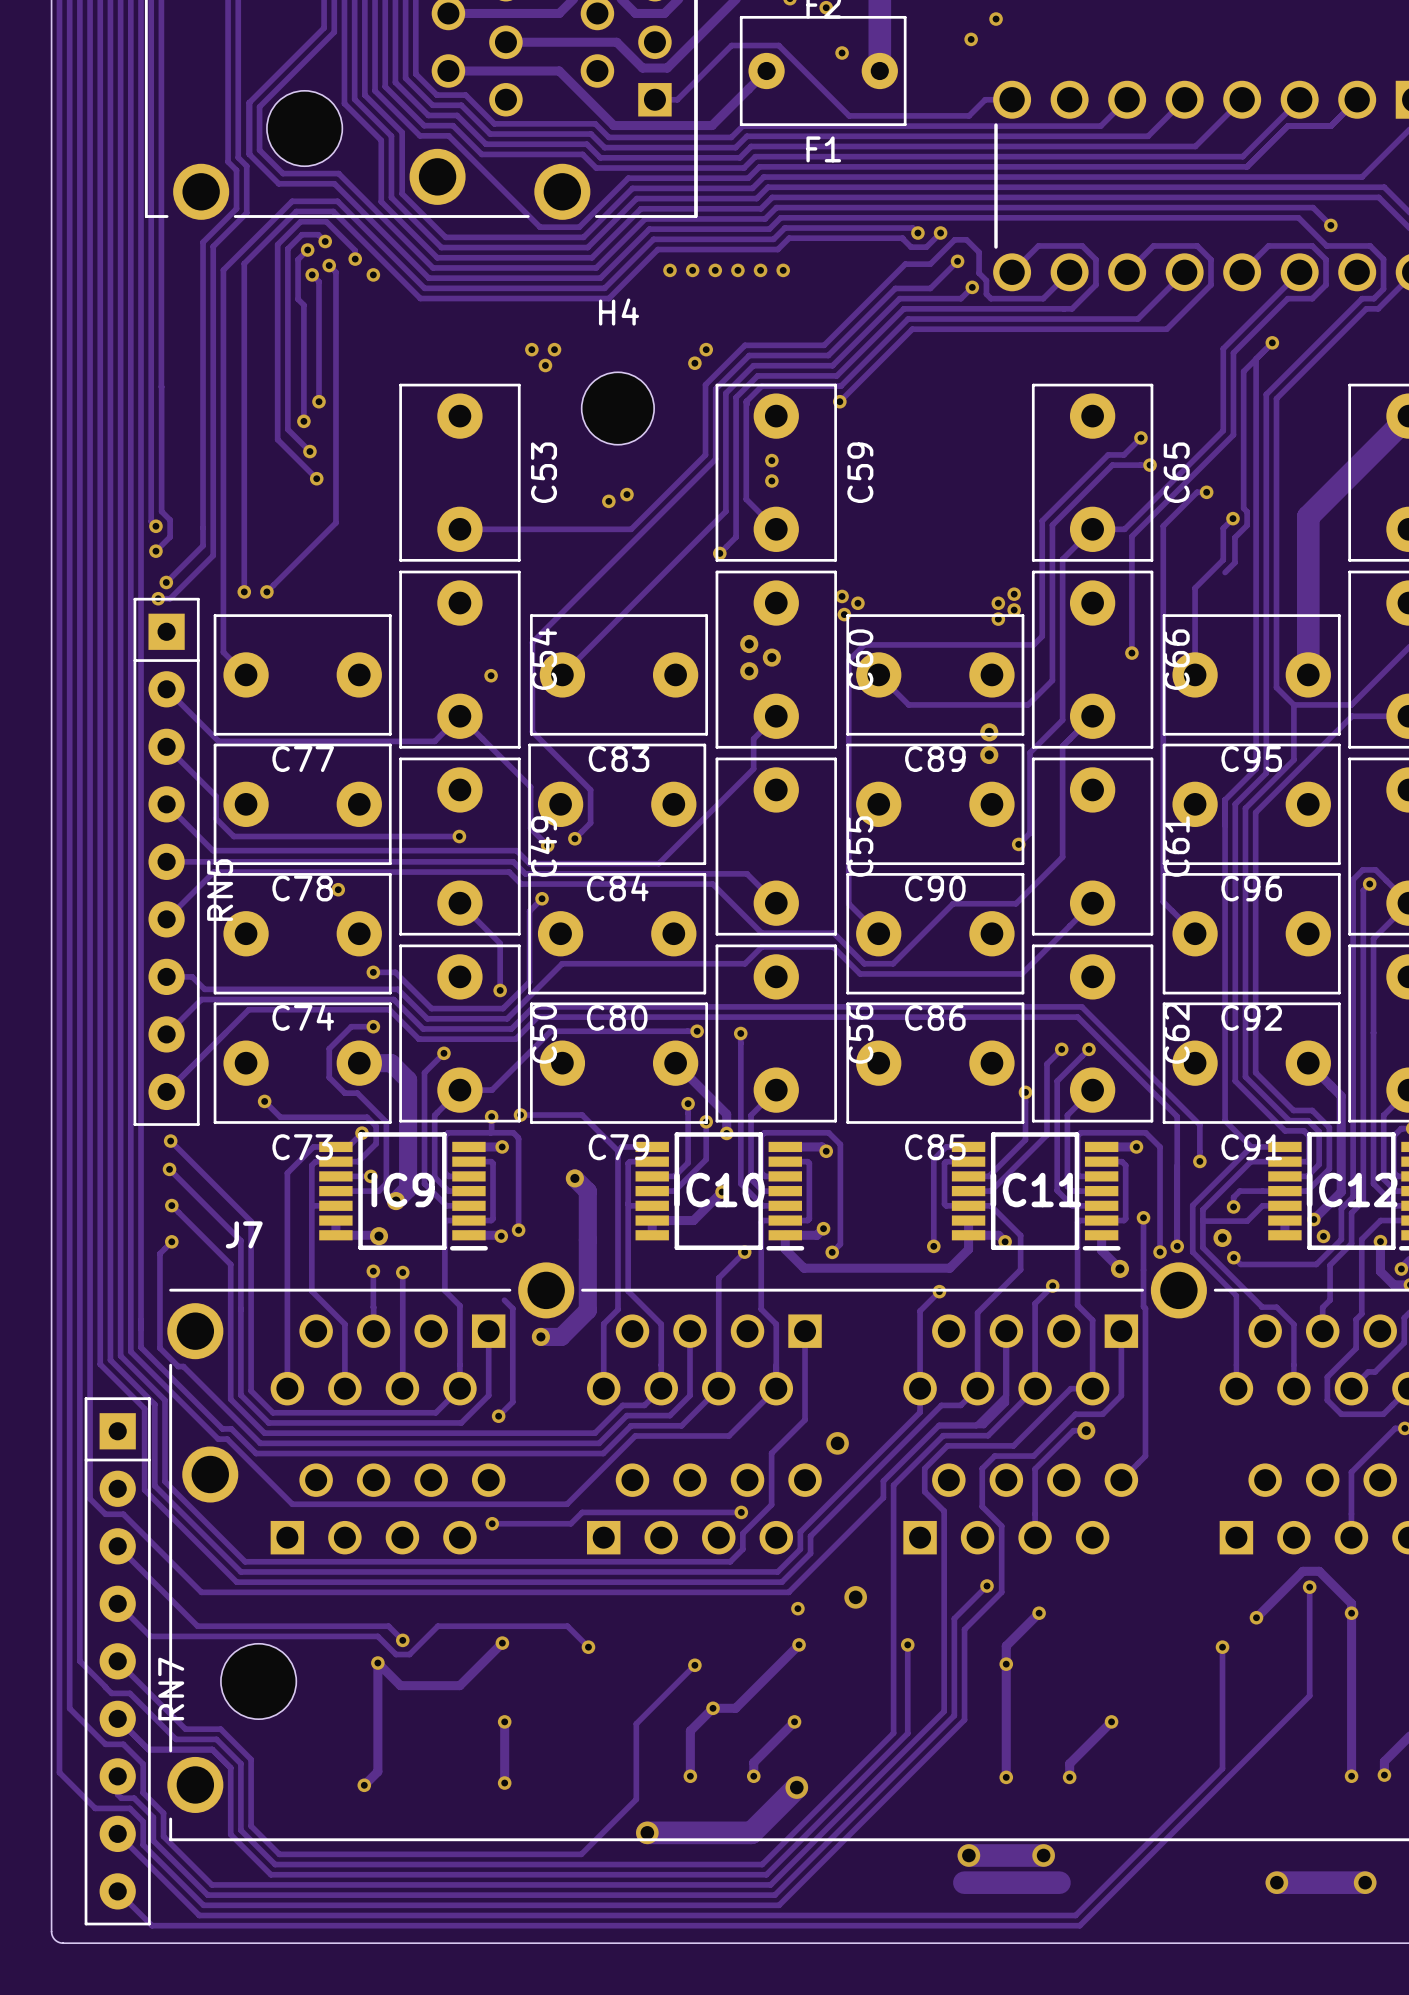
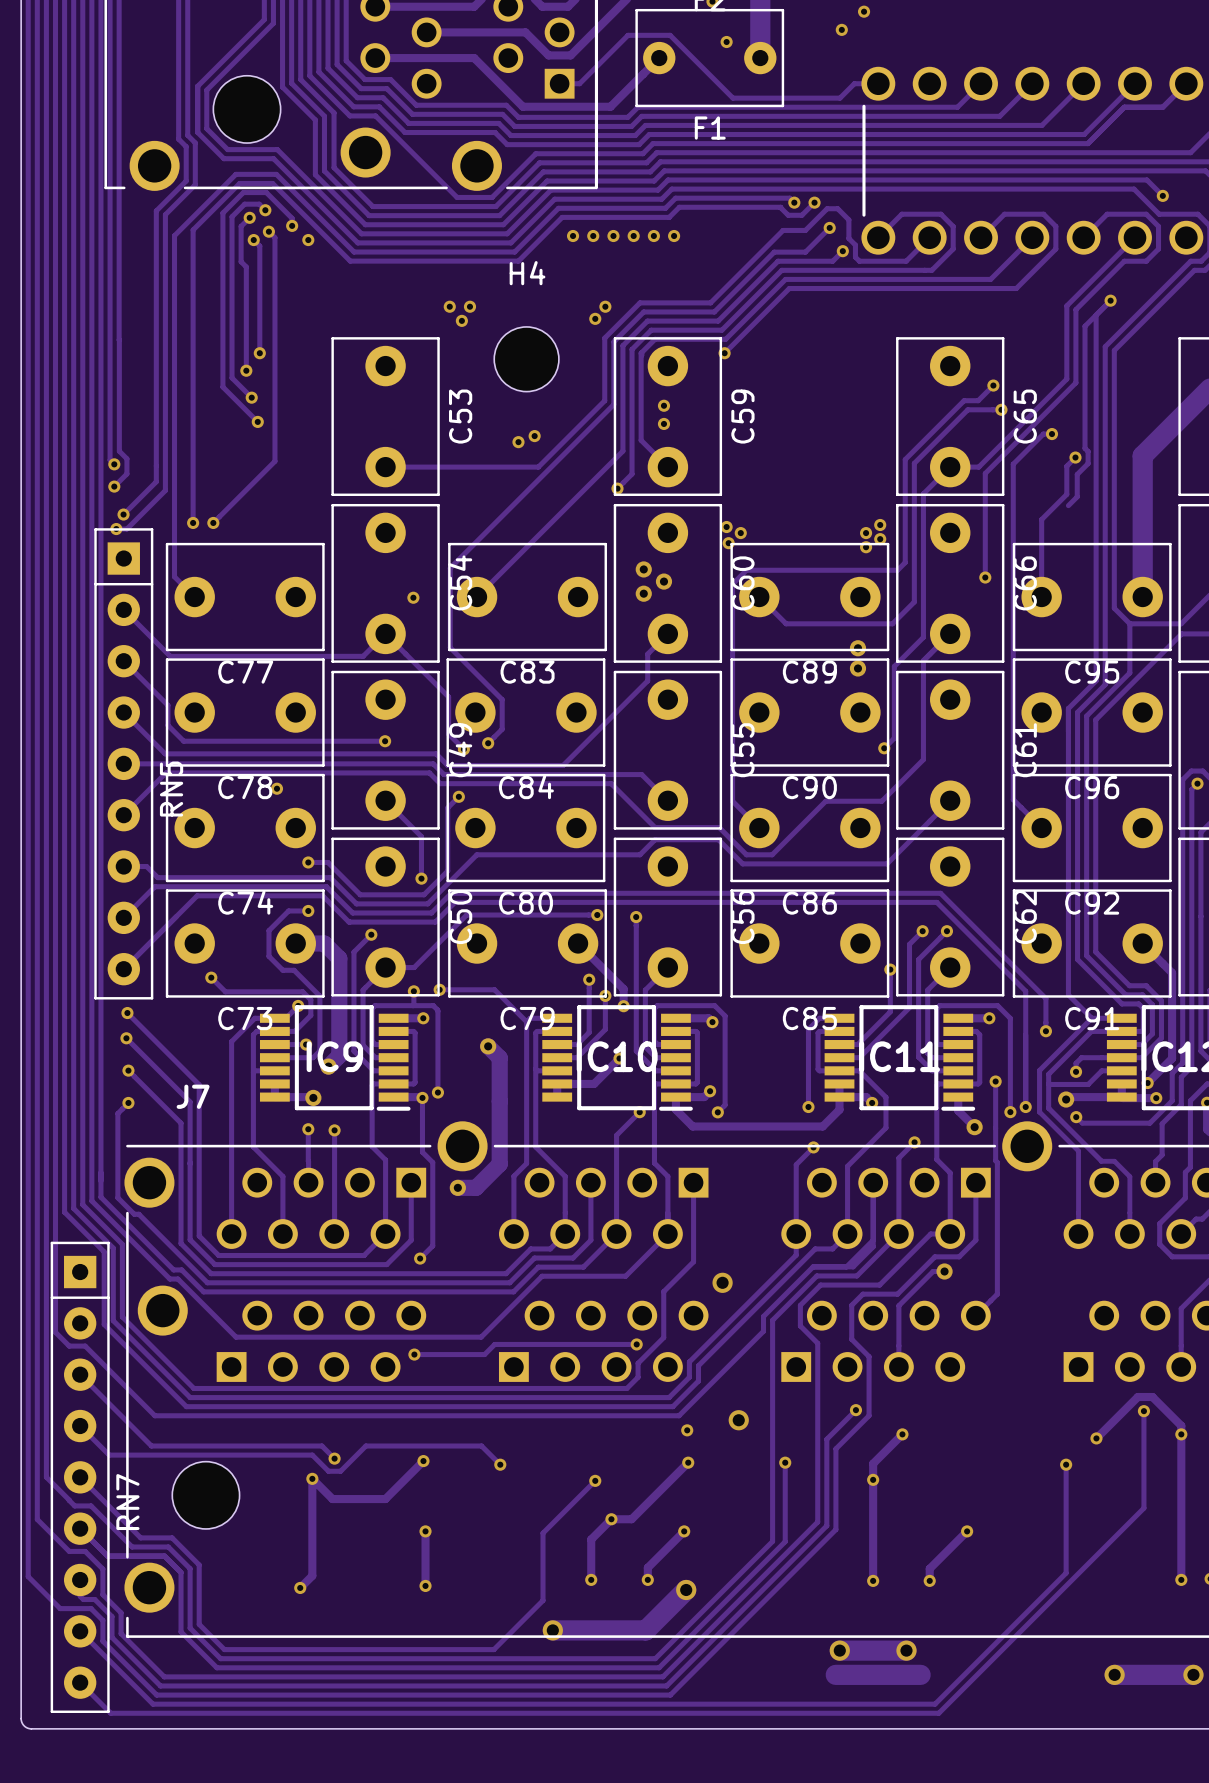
track: none -> (422, 1097) (422, 1152) (425, 1155)
track: none -> (1067, 1098) (1156, 1098)

